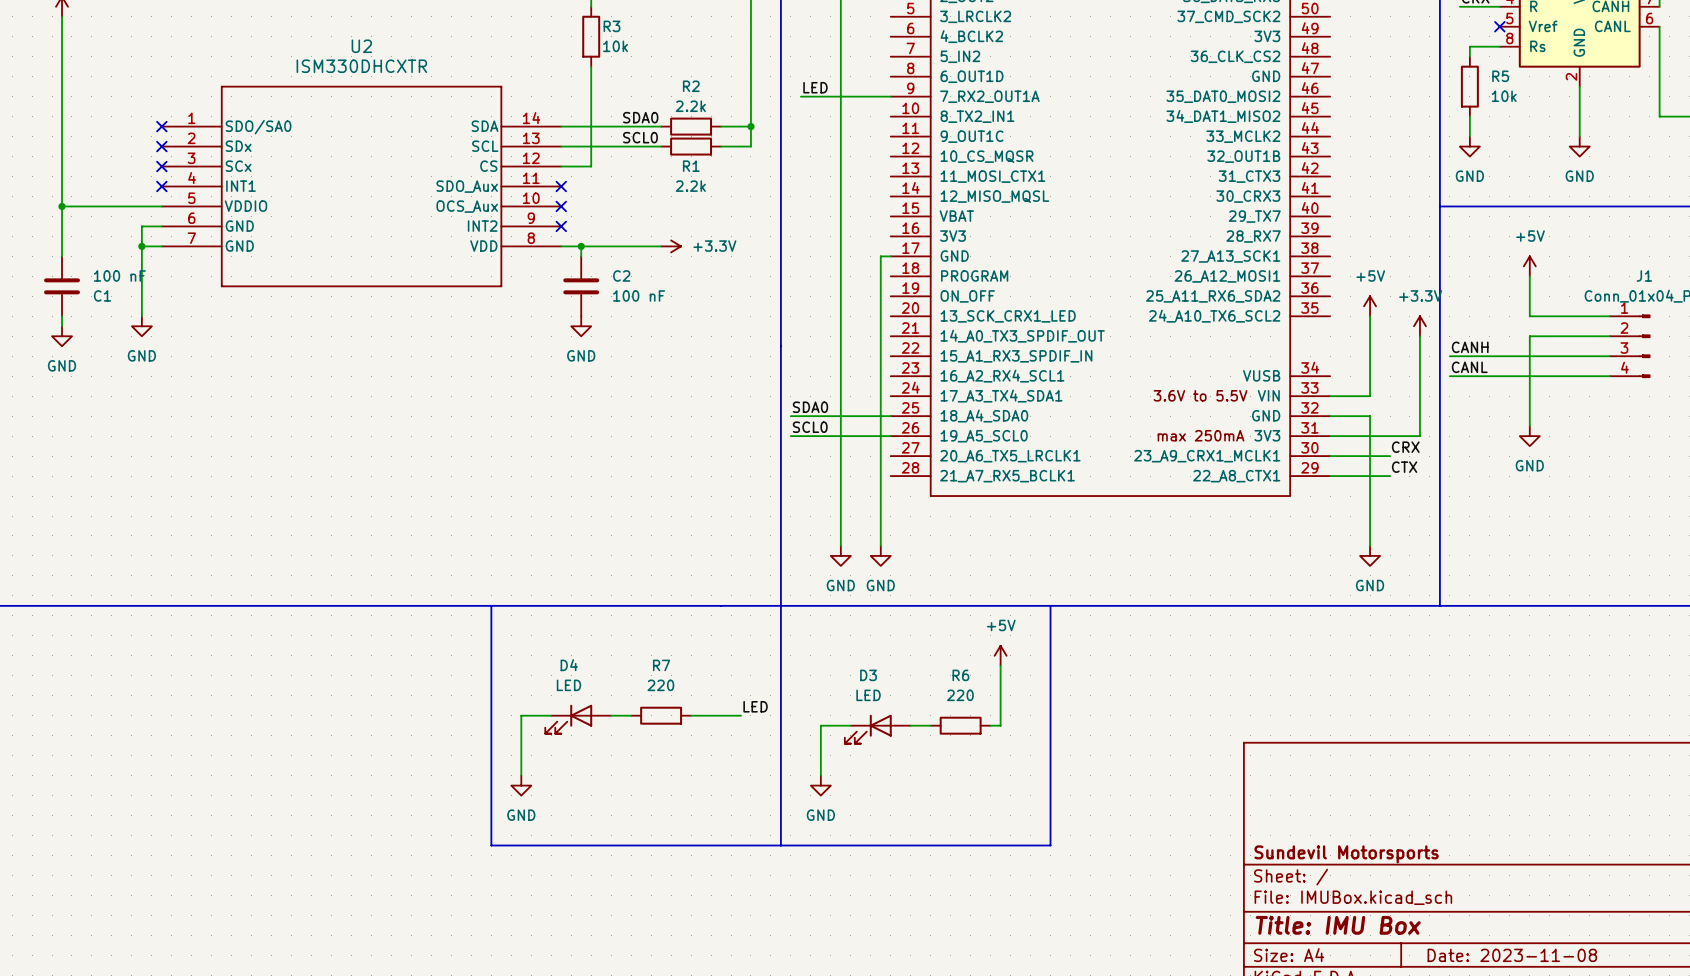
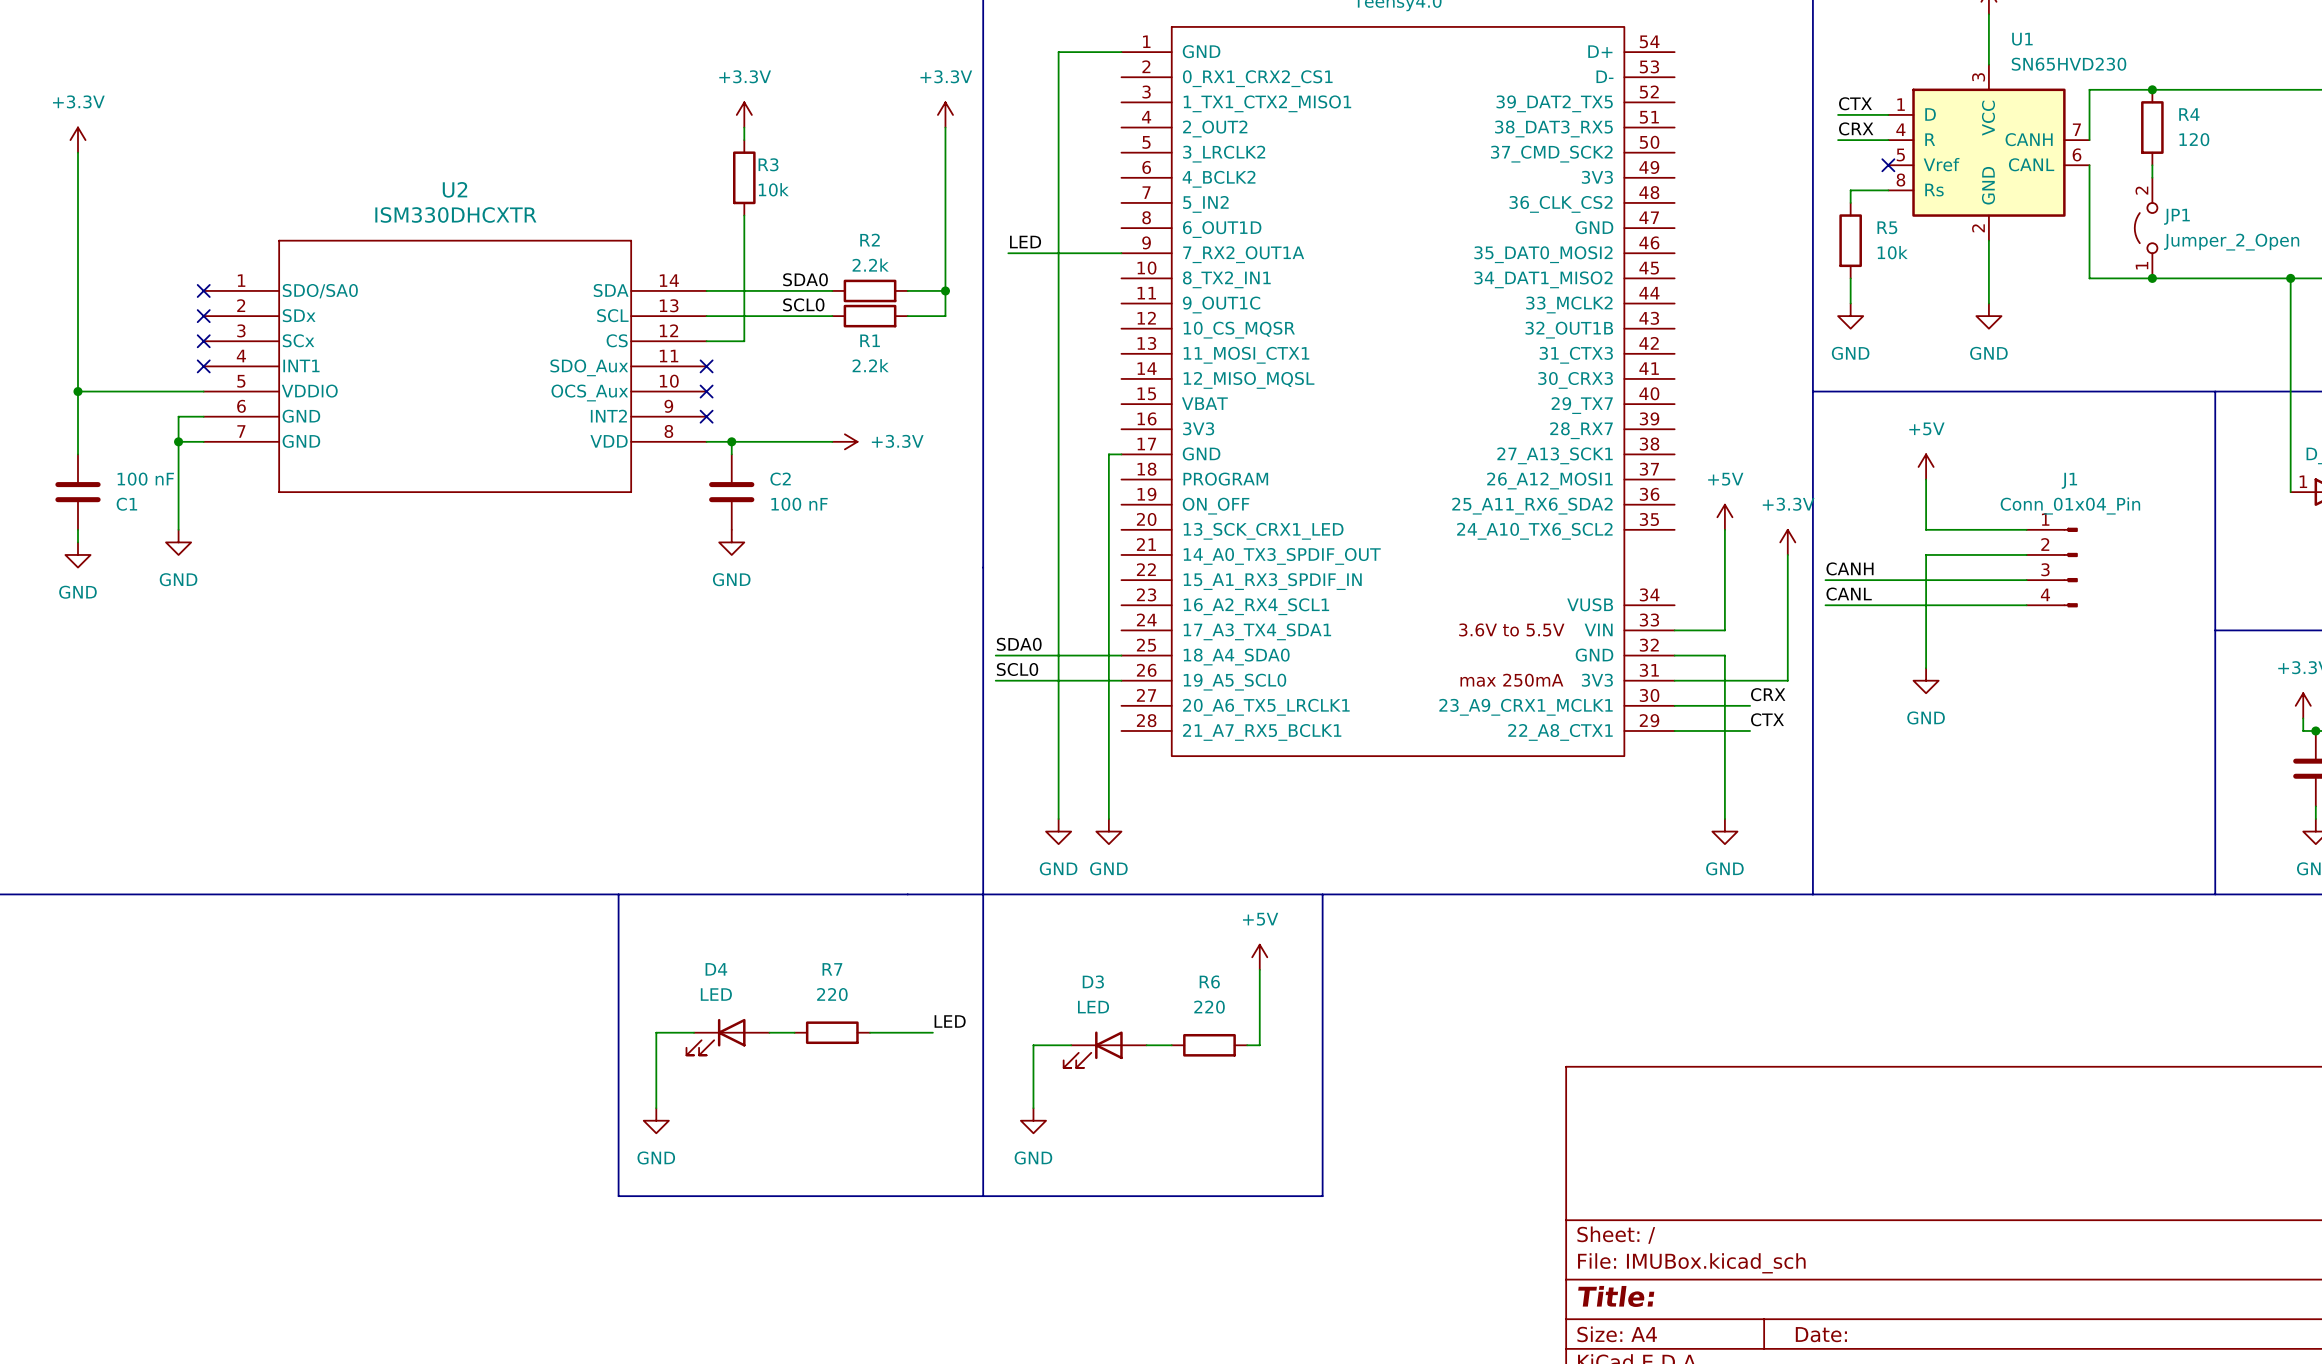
title block: Sundevil Motorsports (1346, 854) -> none
title block: Title: IMU Box (1338, 925) -> Title: (1616, 1296)
title block: Date: 2023-11-08 (1512, 955) -> Date: (1821, 1334)

